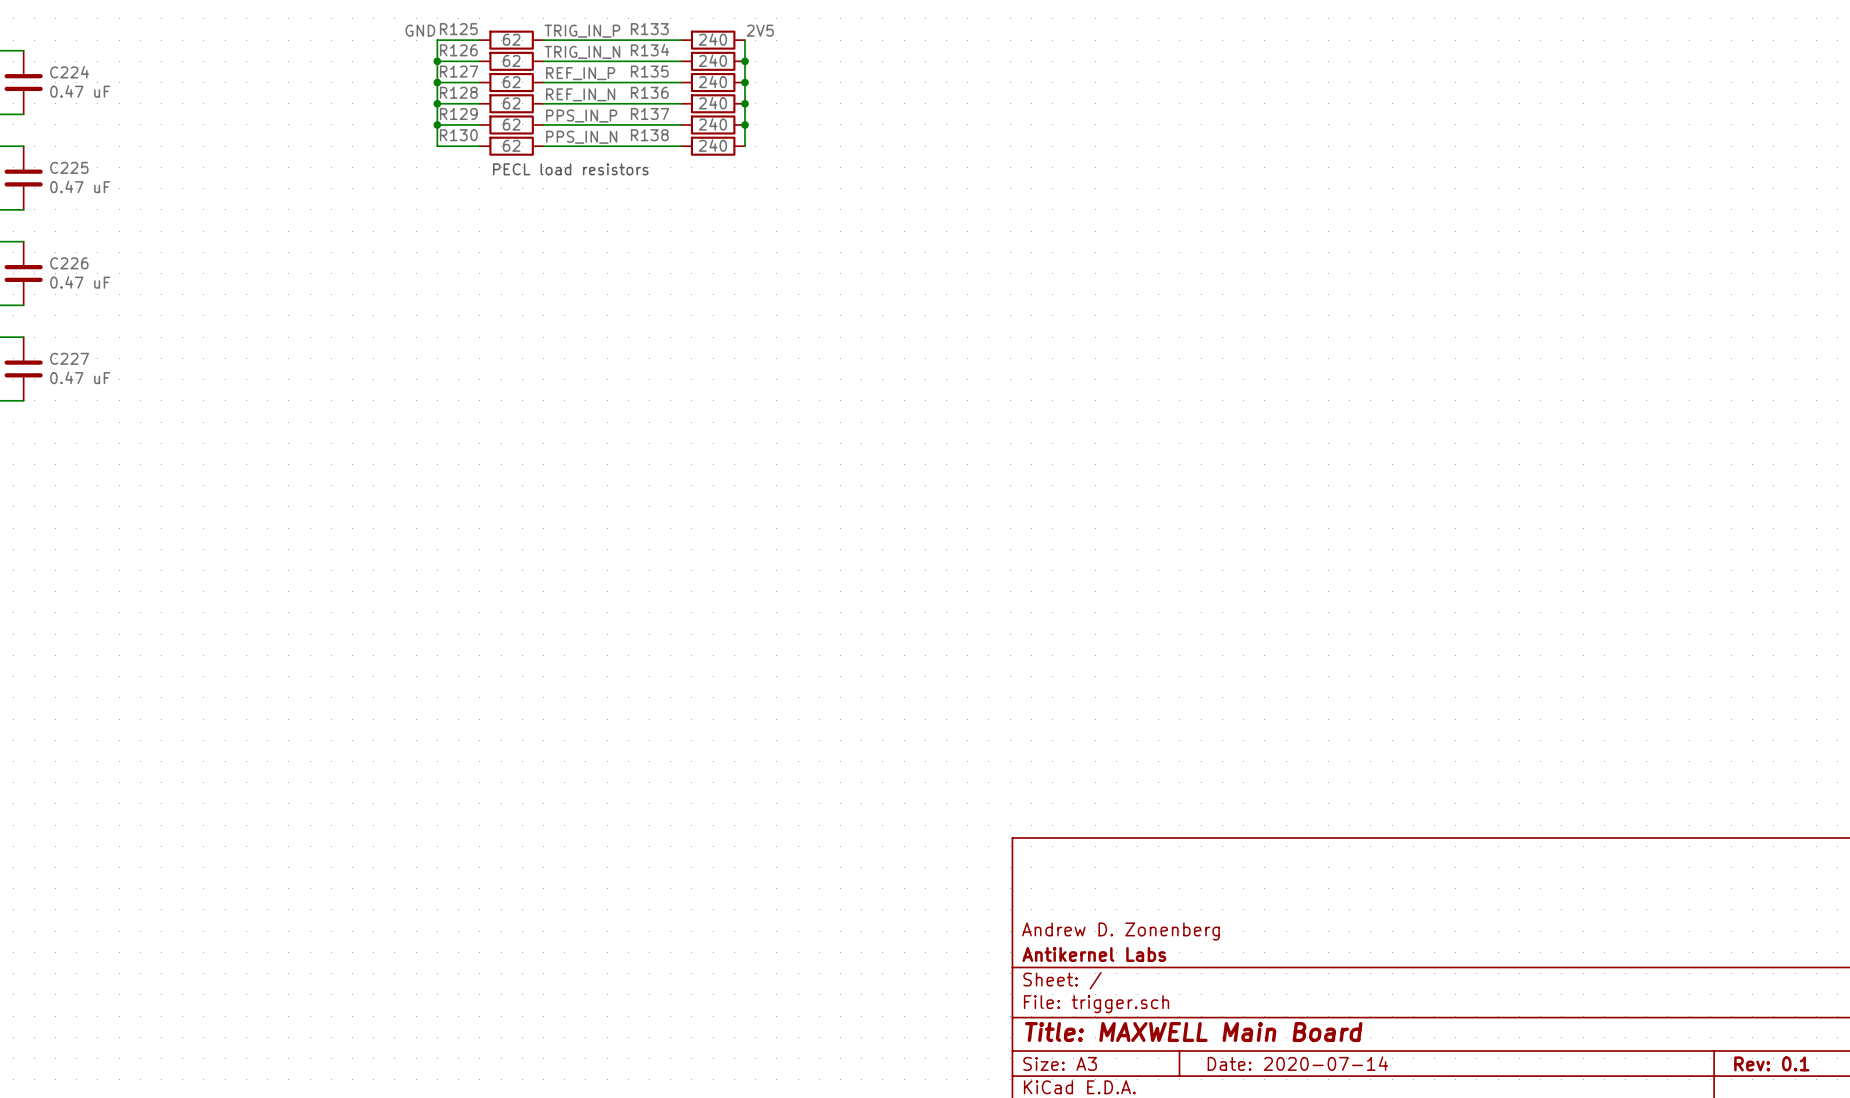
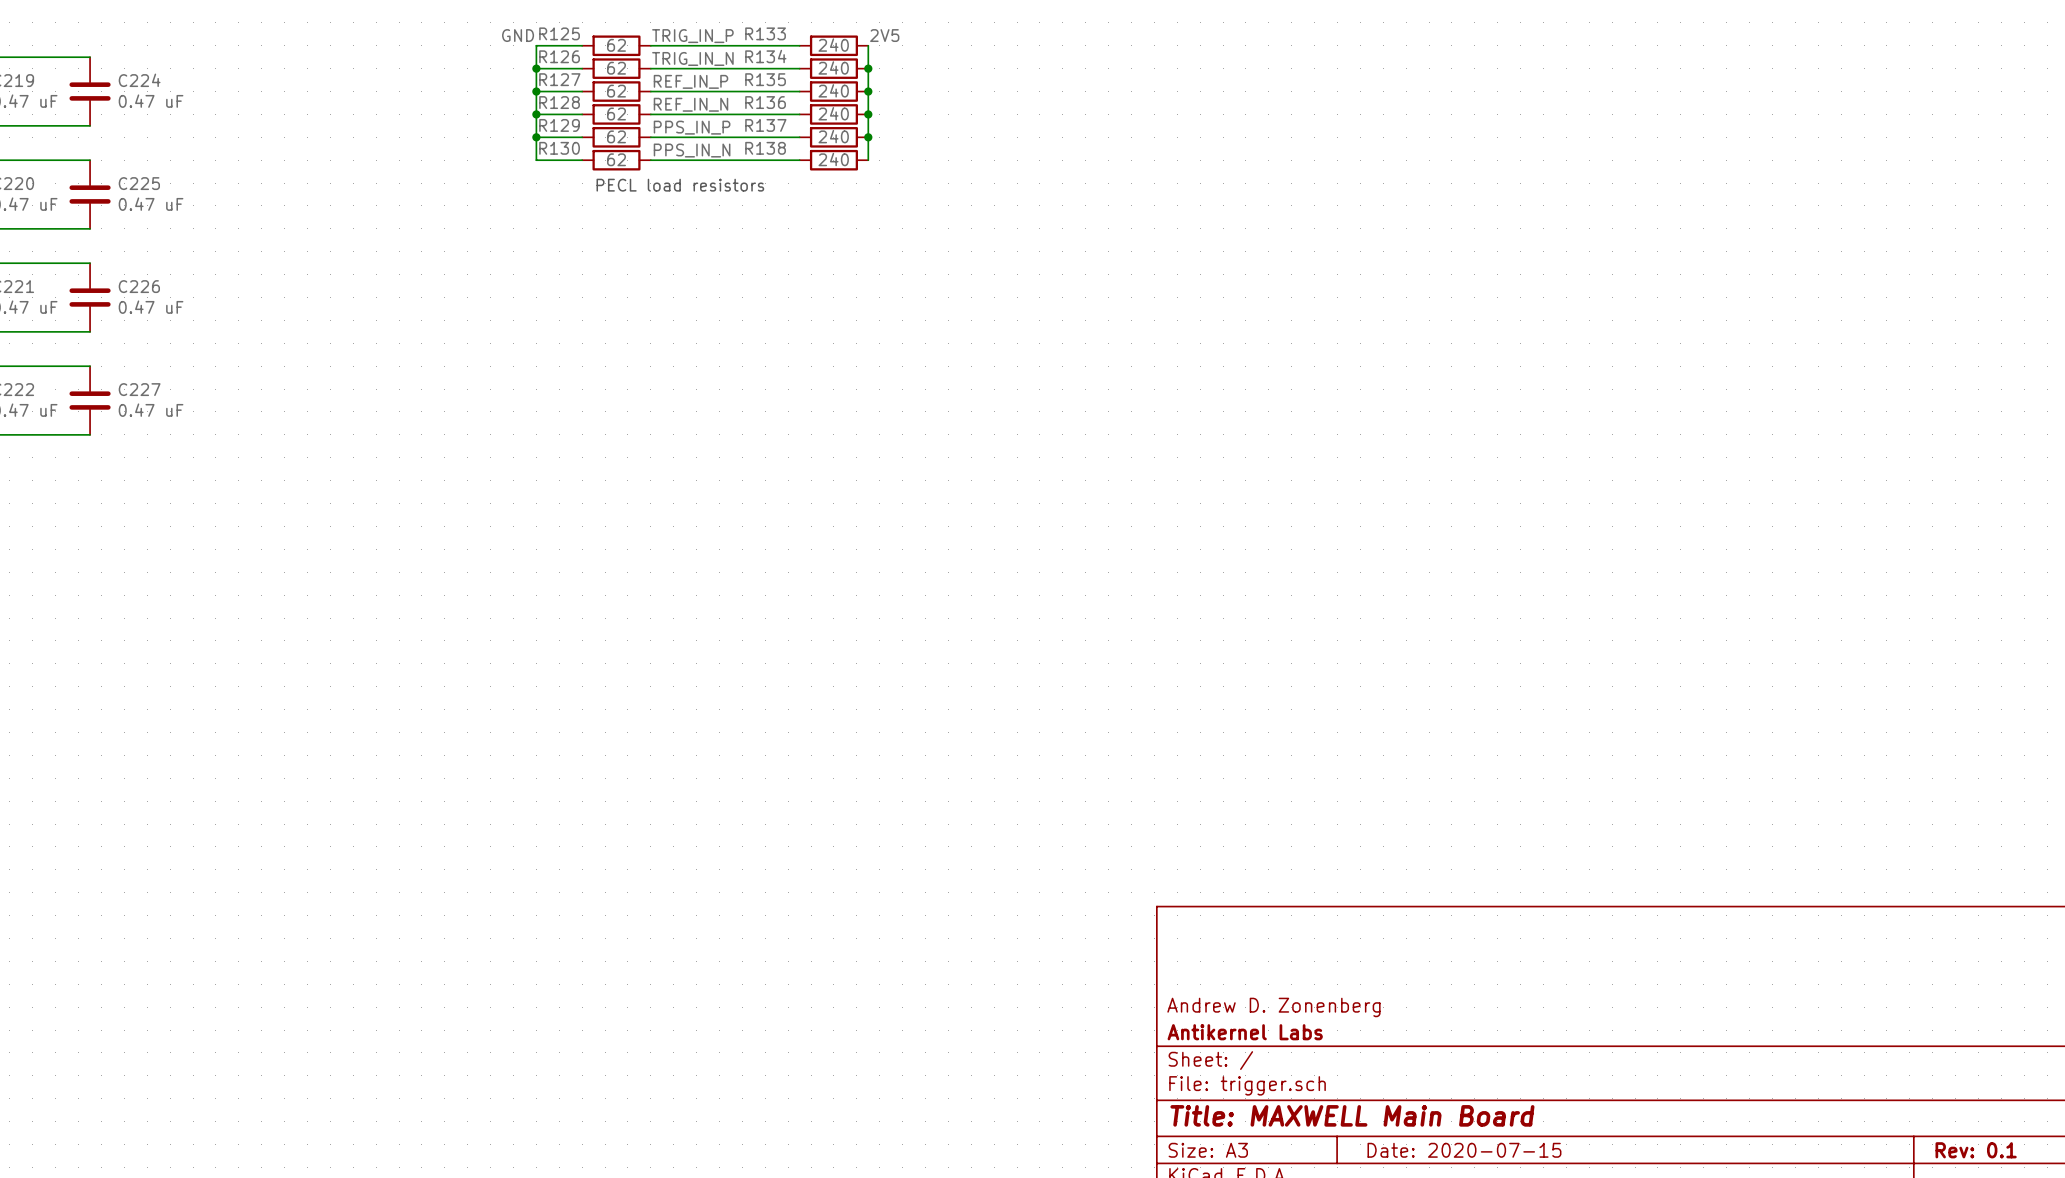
title block: Date: 2020-07-14 (1297, 1063) -> Date: 2020-07-15 (1464, 1150)

